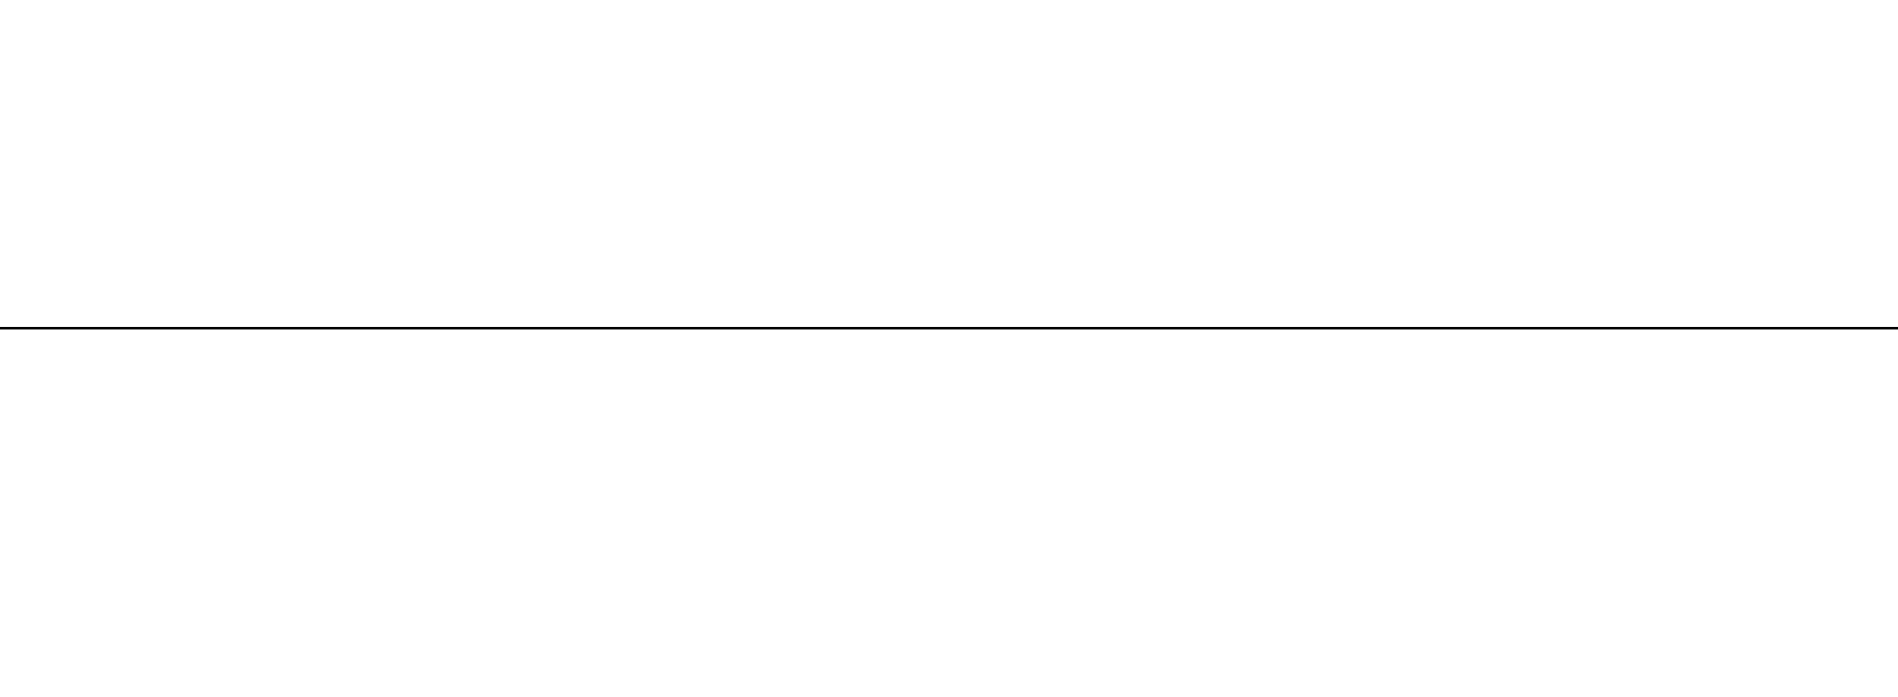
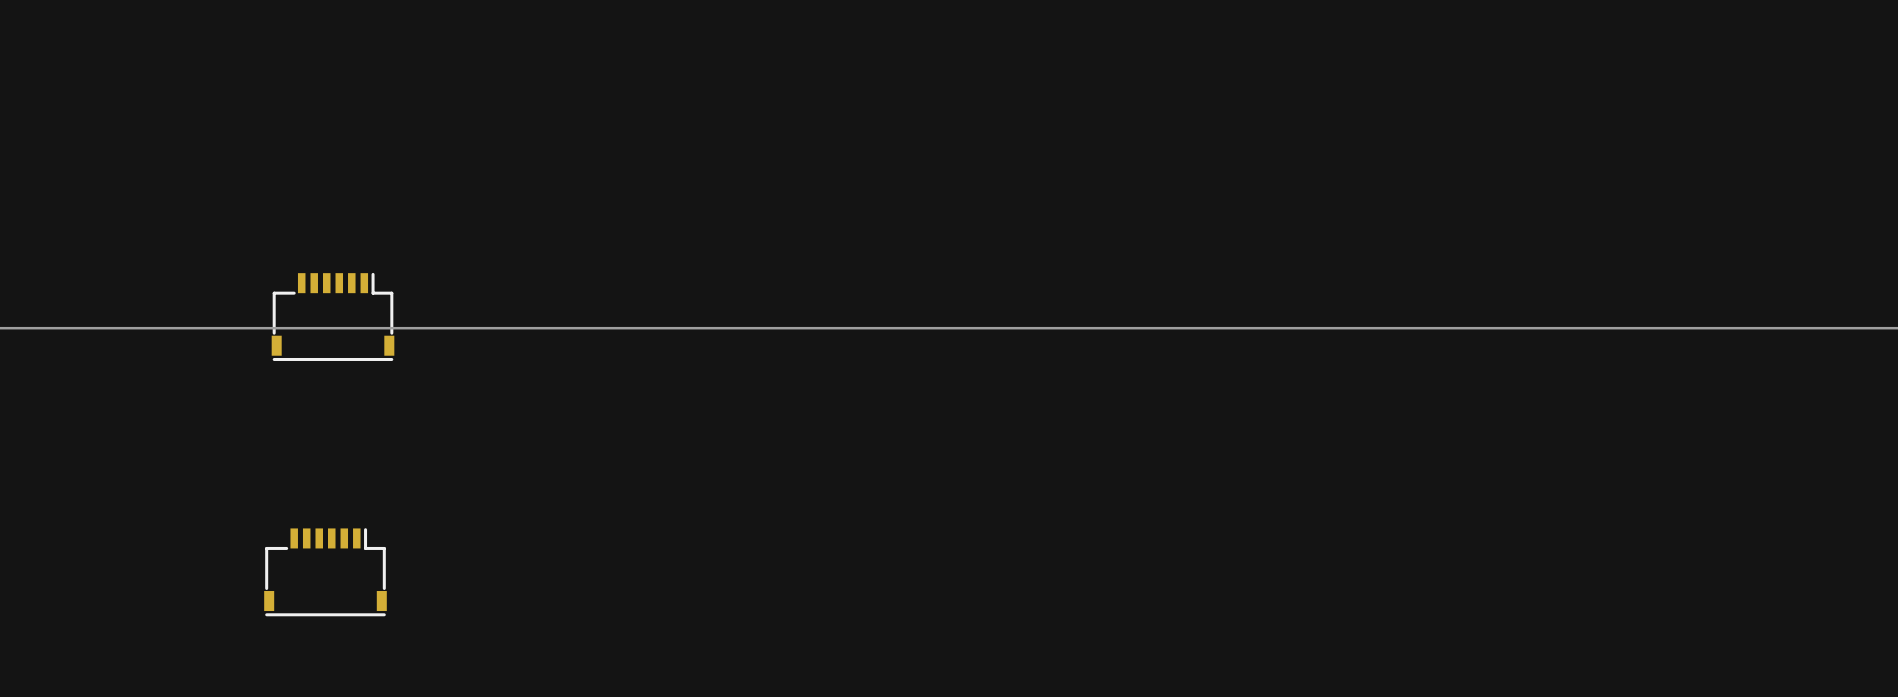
part: none -> (333, 316)
part: none -> (325, 572)

